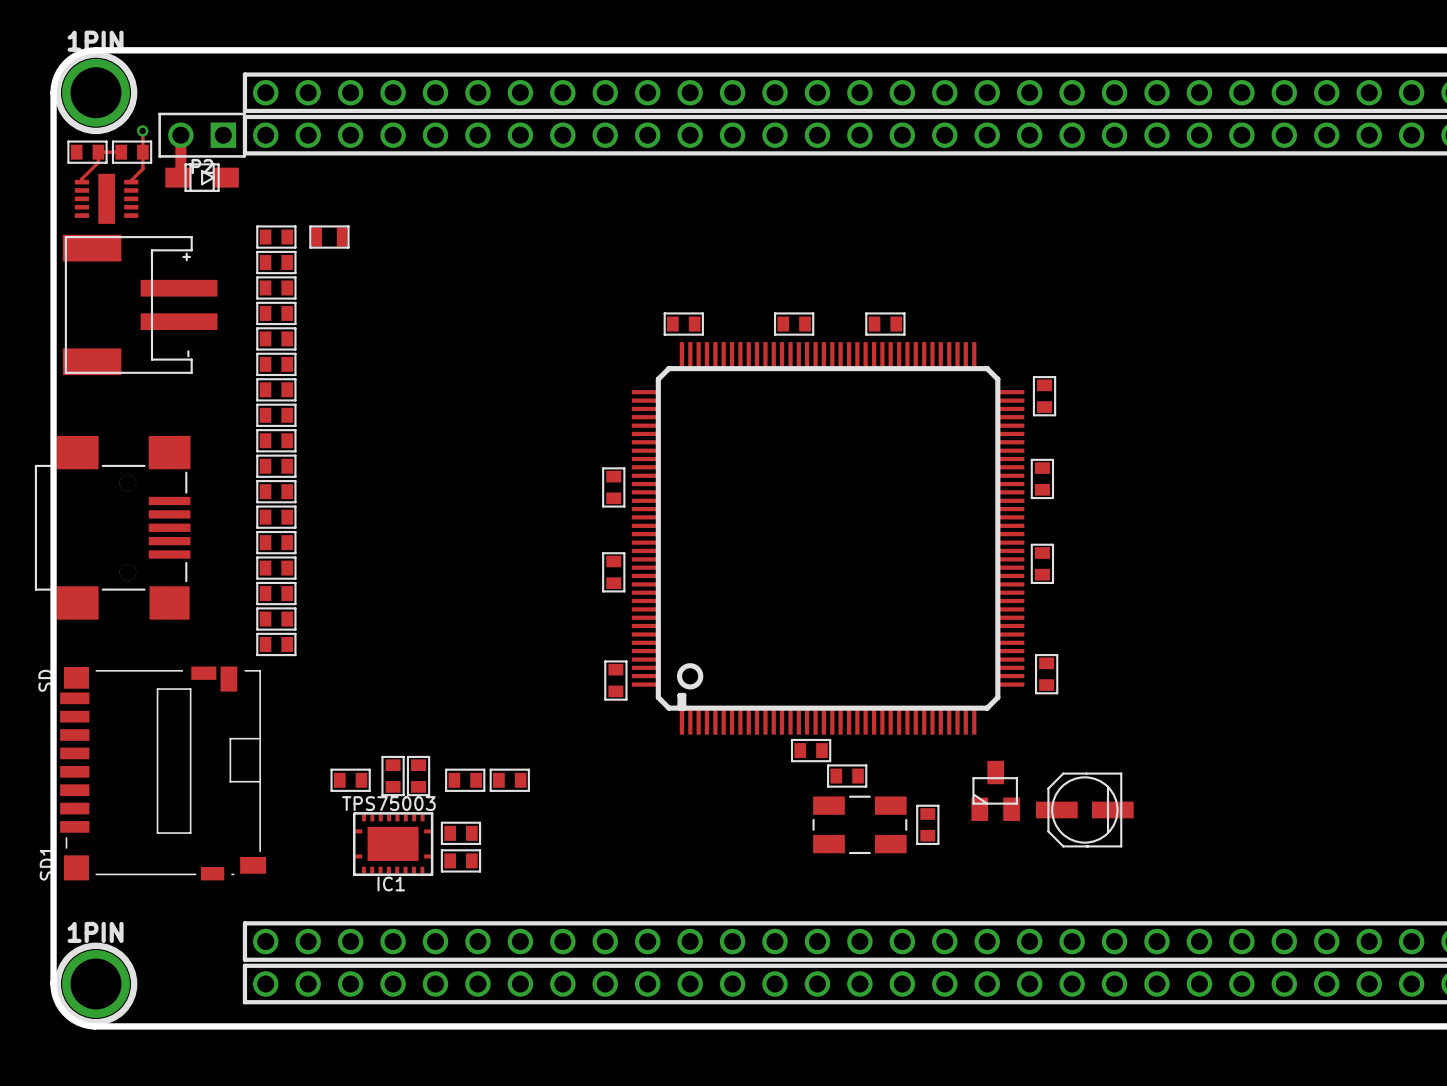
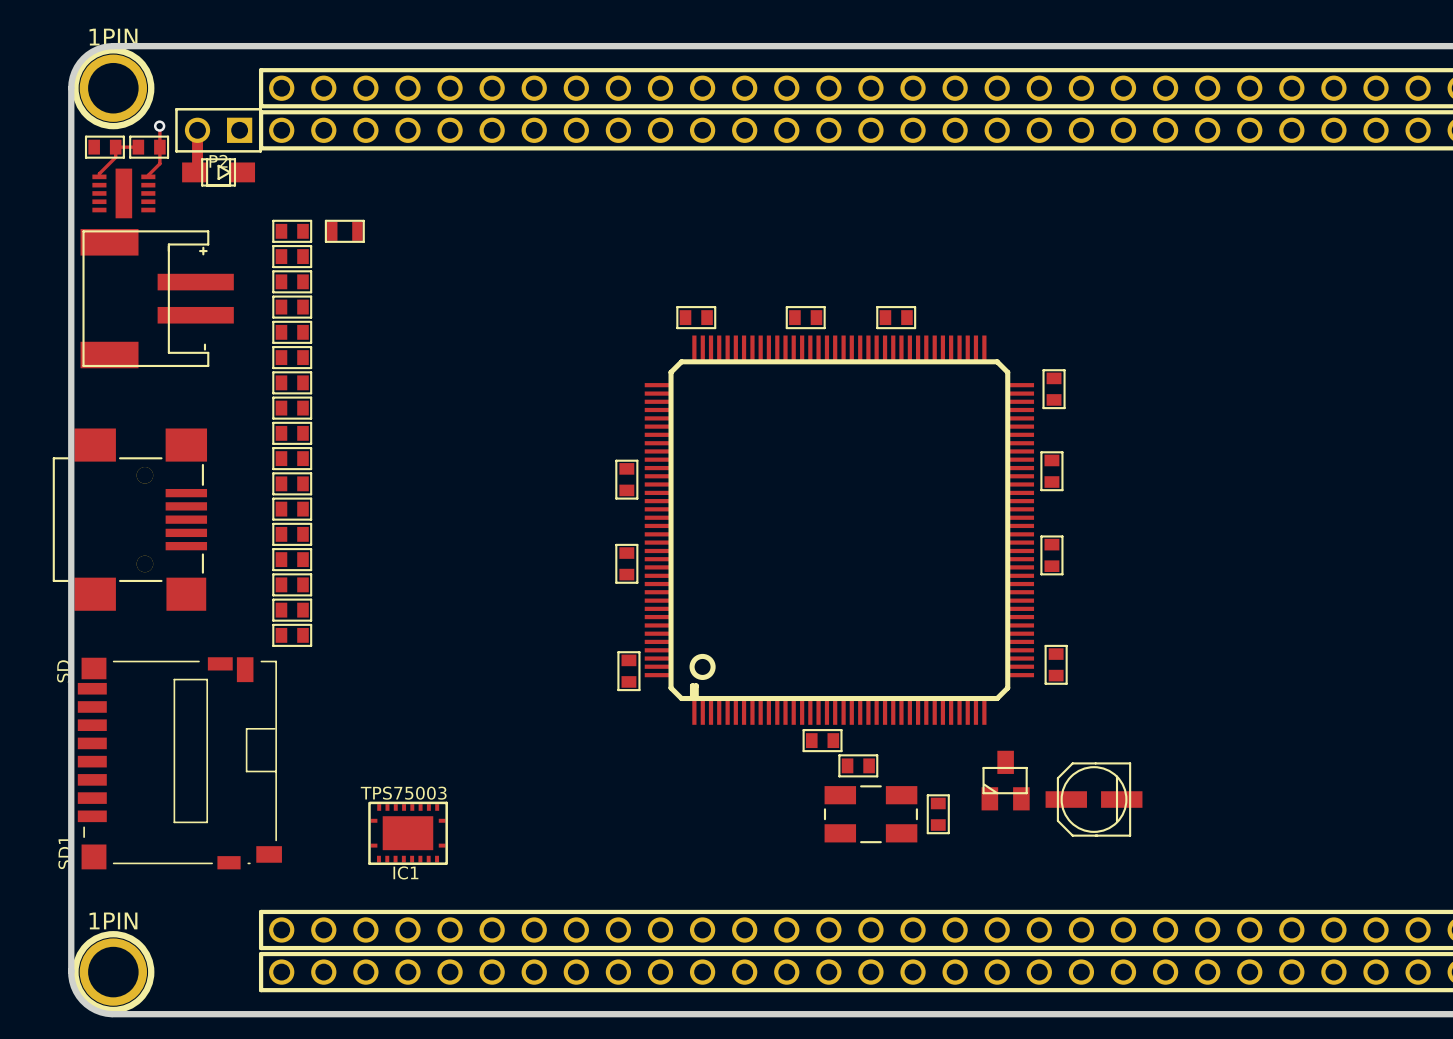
part: (393, 776) -> none
part: (418, 776) -> none
part: (350, 780) -> none
part: (465, 780) -> none
part: (509, 780) -> none
part: (460, 833) -> none
part: (460, 860) -> none

